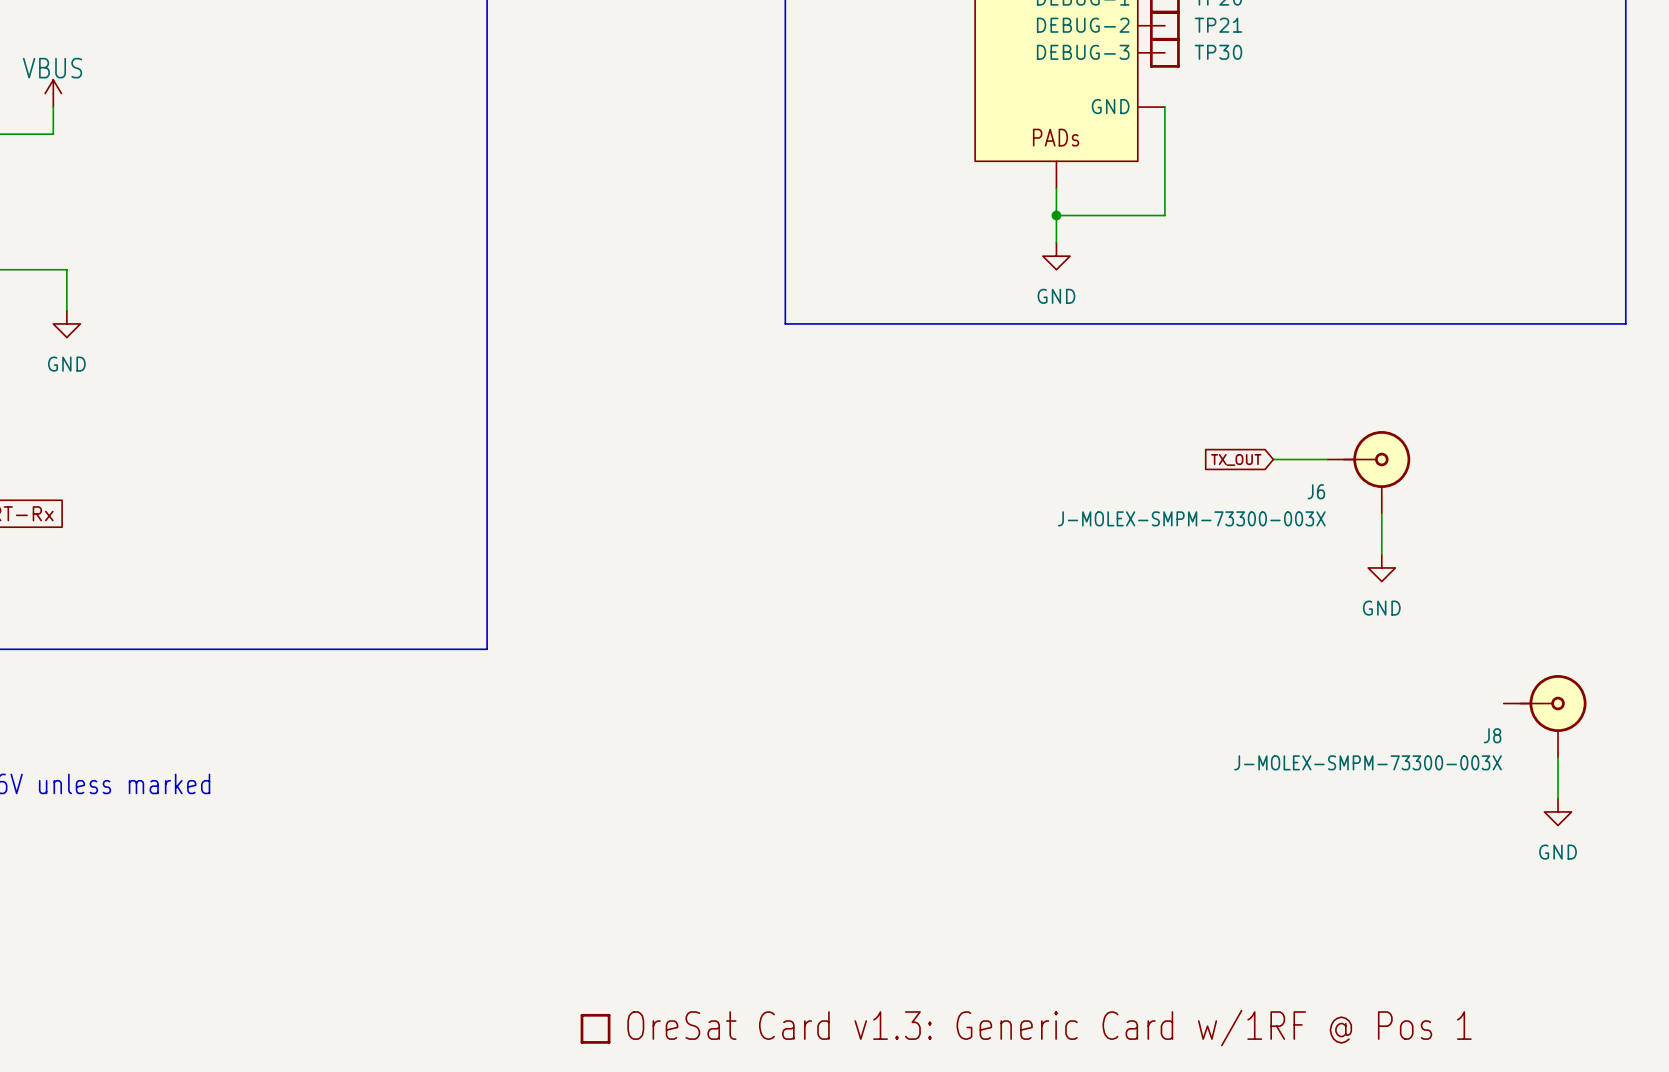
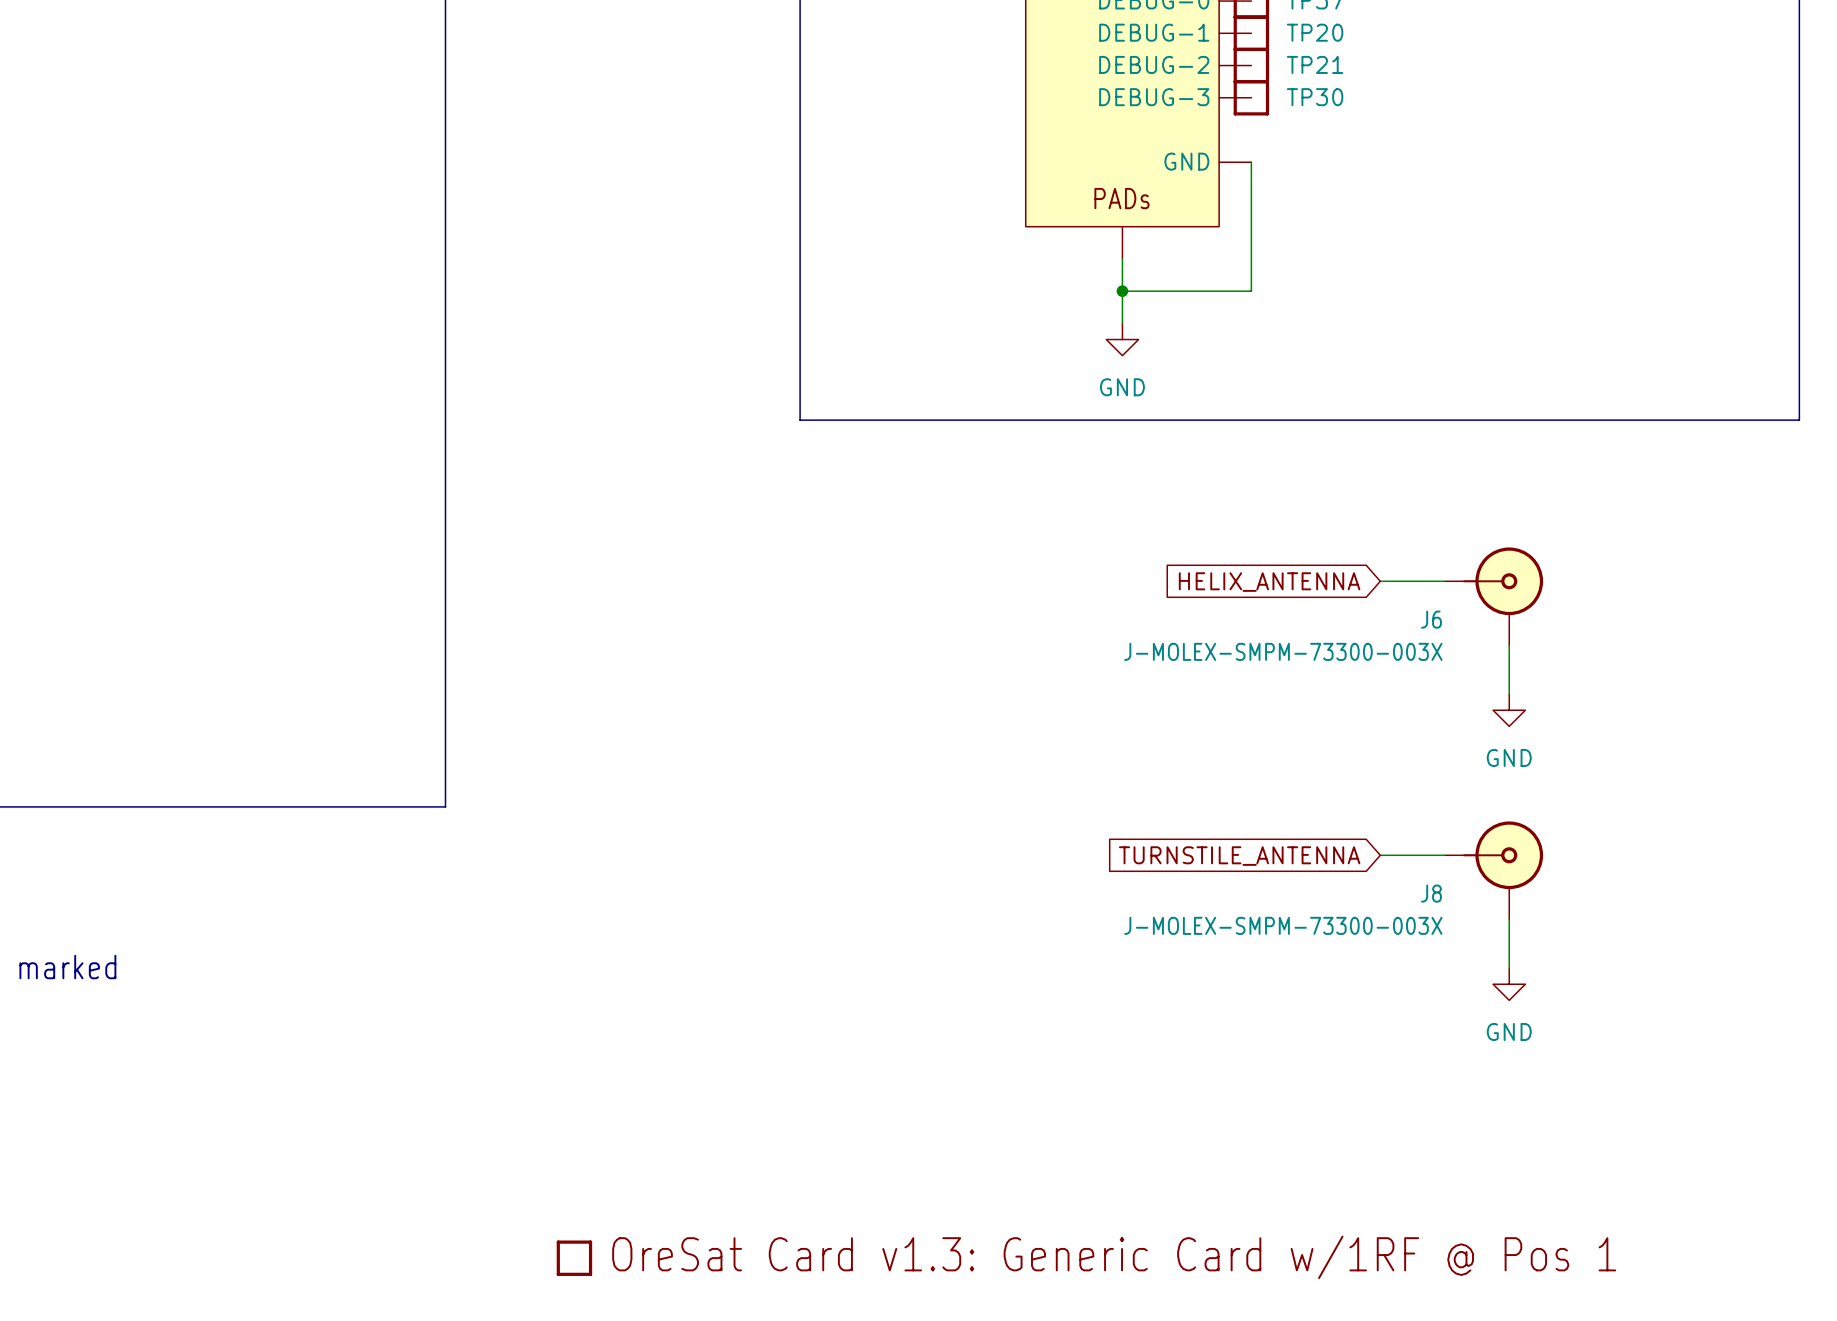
global label: TX_OUT (1236, 459) -> HELIX_ANTENNA (1269, 582)
wire: none -> (1380, 855) (1444, 855)
global label: none -> TURNSTILE_ANTENNA (1239, 856)
J8 position: (1545, 716) -> (1493, 870)
wire: (1558, 757) (1558, 798) -> (1509, 919) (1509, 968)
power symbol position: GND (1558, 811) -> GND (1509, 984)

